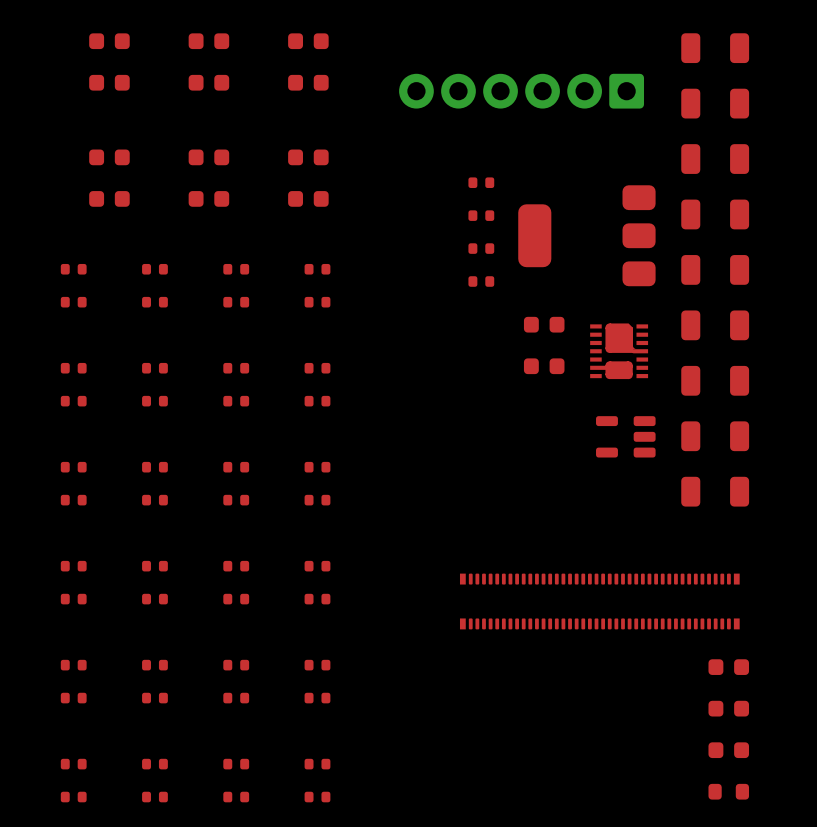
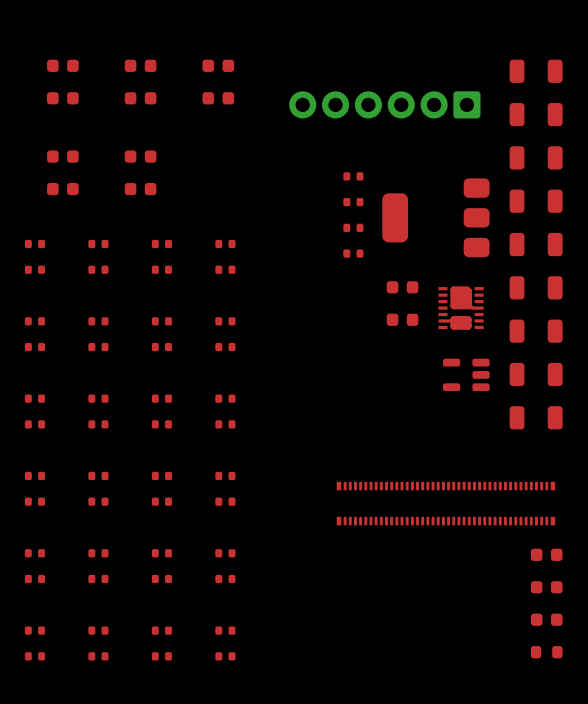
part: (308, 157) -> none
part: (308, 198) -> none

